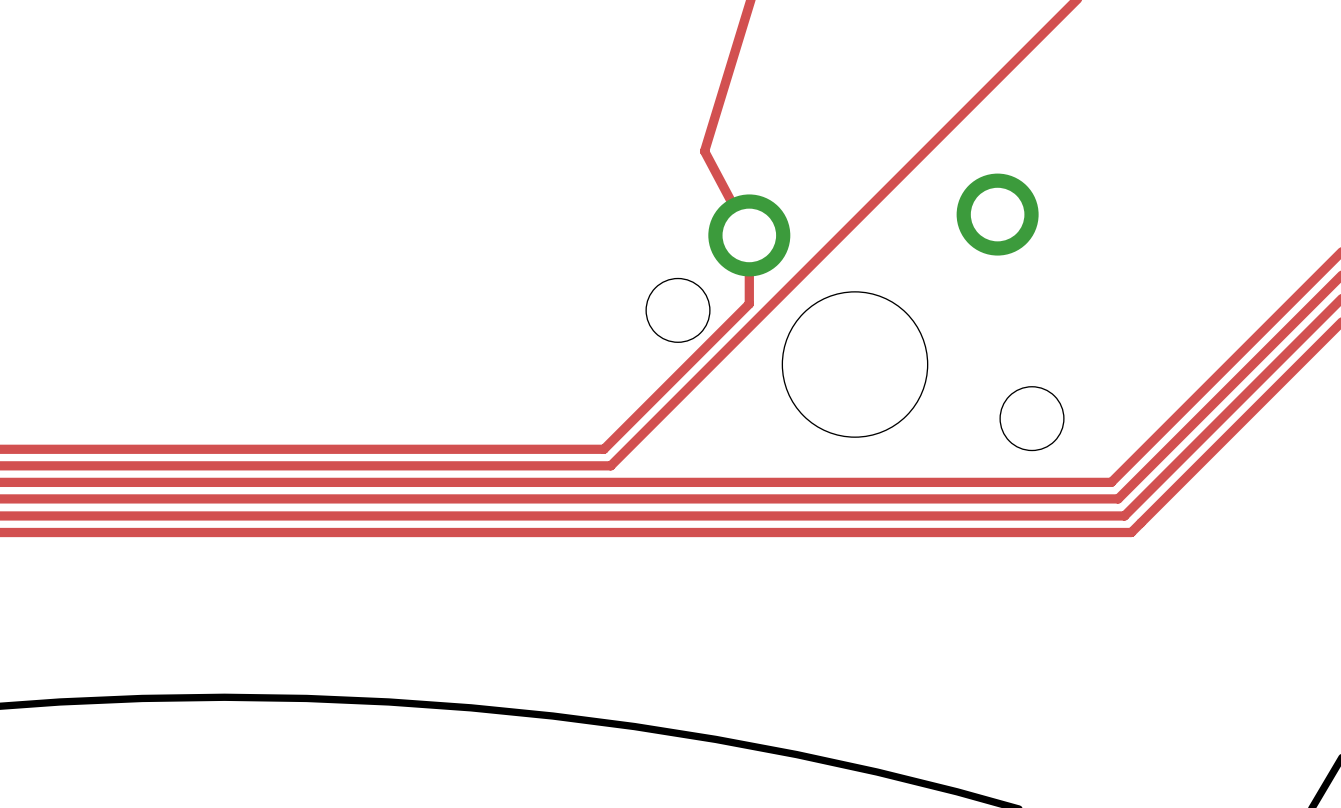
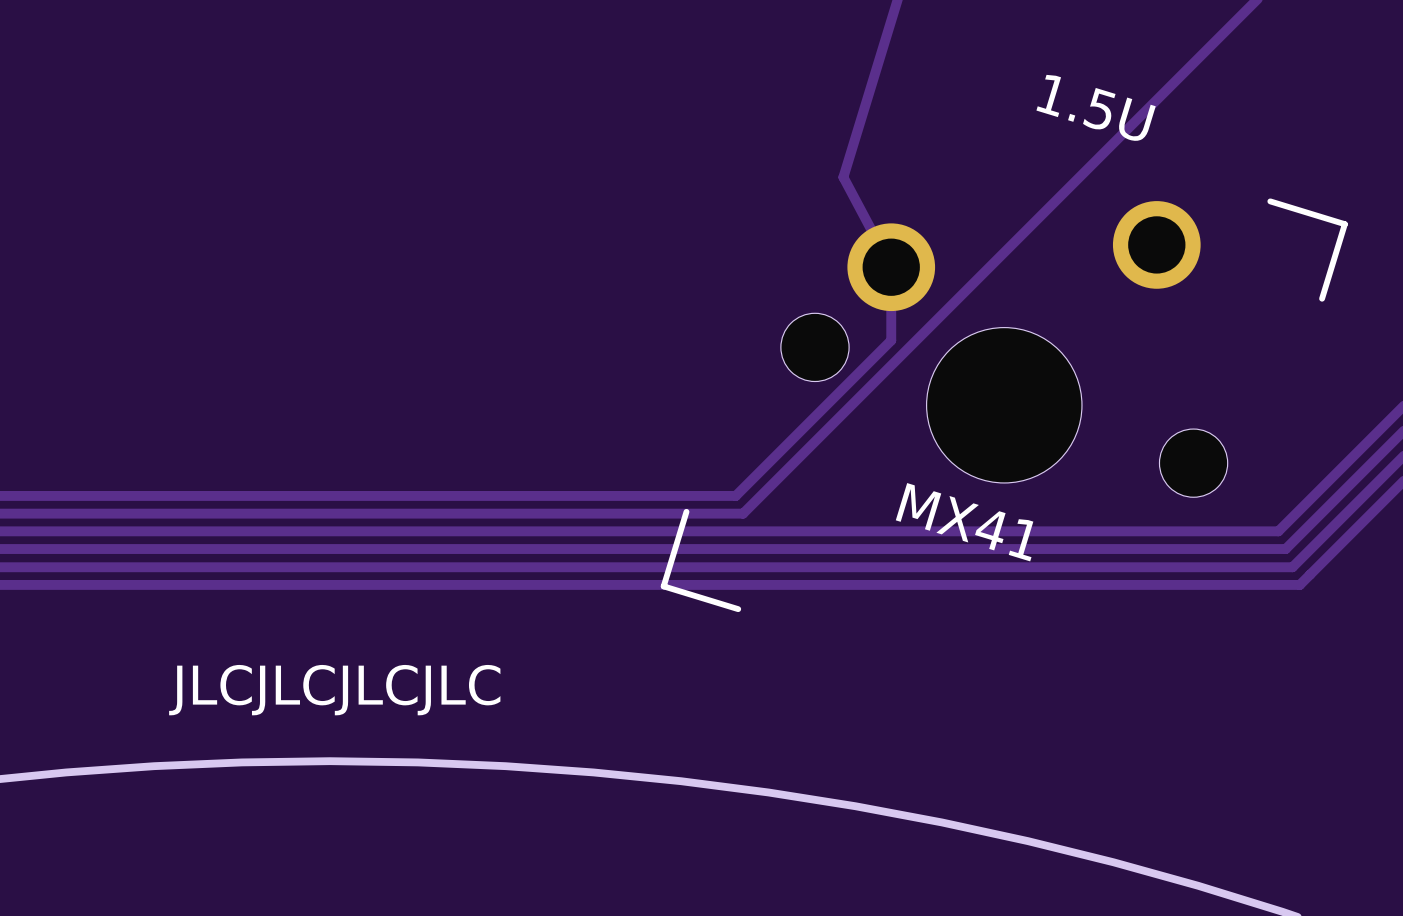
MX41: none -> 1.5U (1004, 405)
text: none -> JLCJLCJLCJLC (334, 690)

